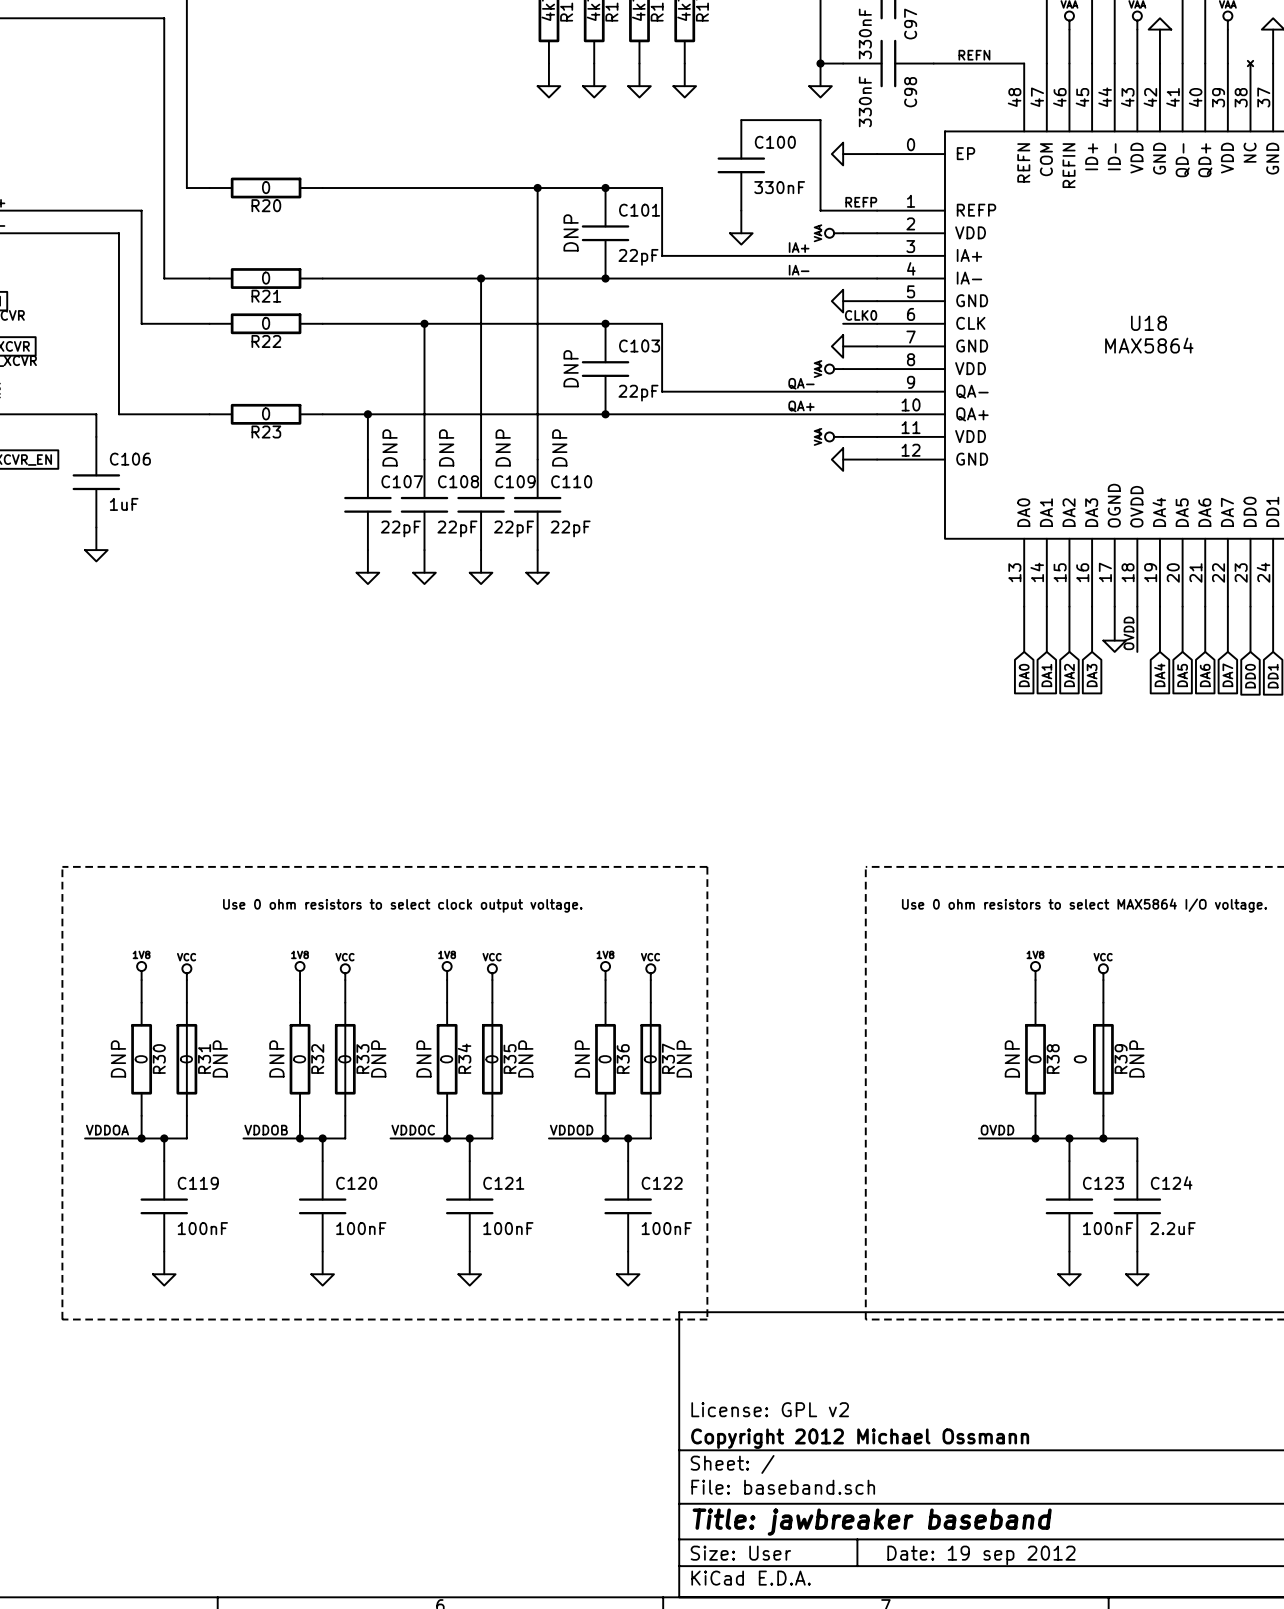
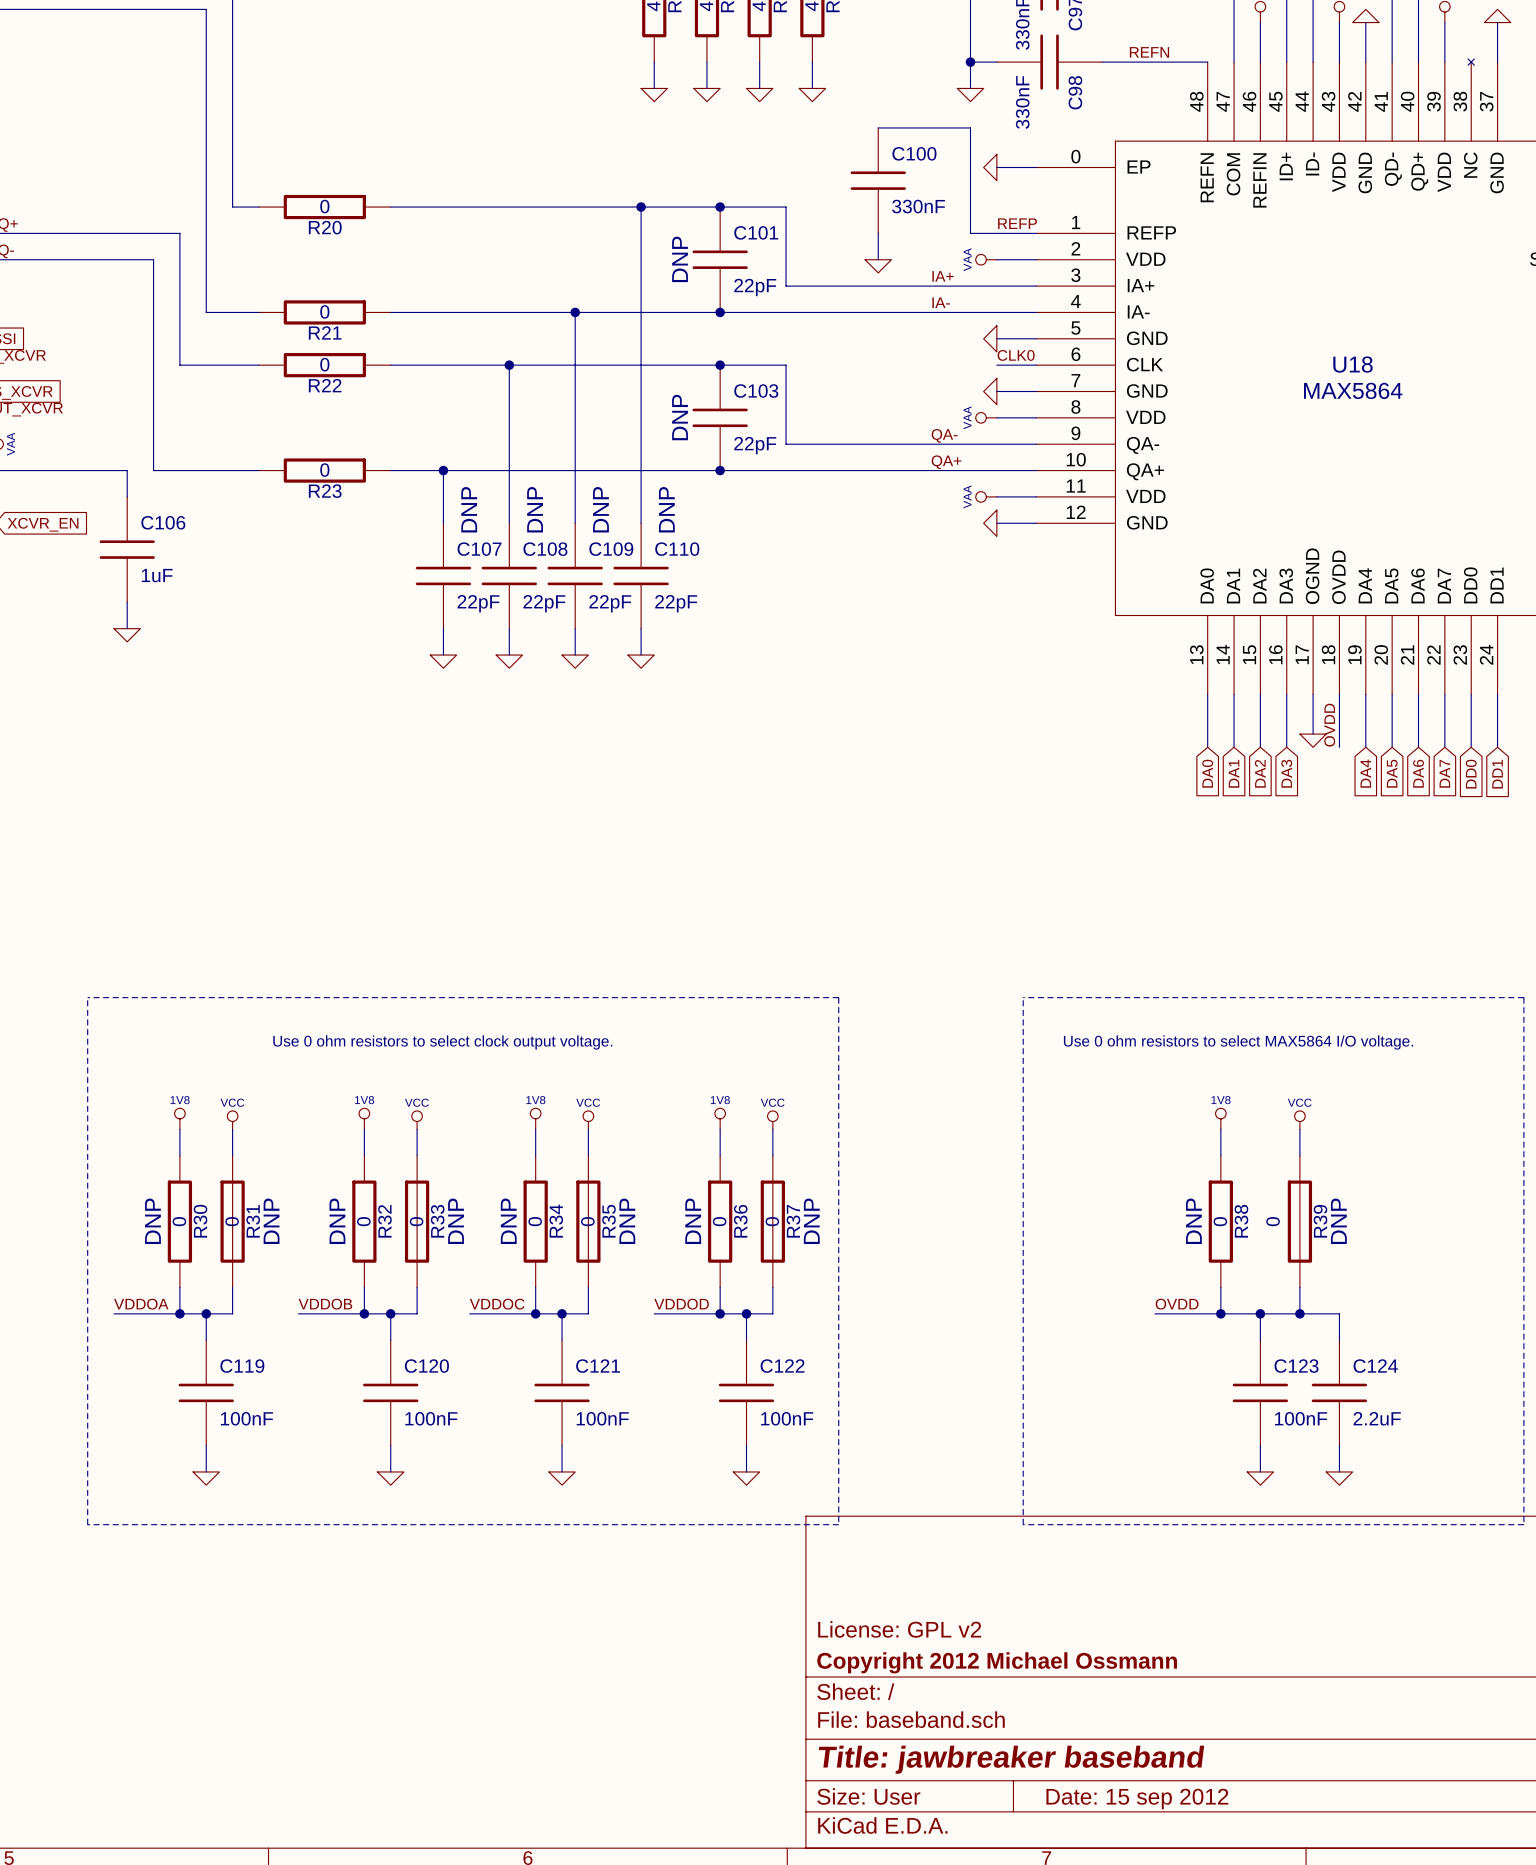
title block: Date: 19 sep 2012 (981, 1555) -> Date: 15 sep 2012 (1137, 1798)

